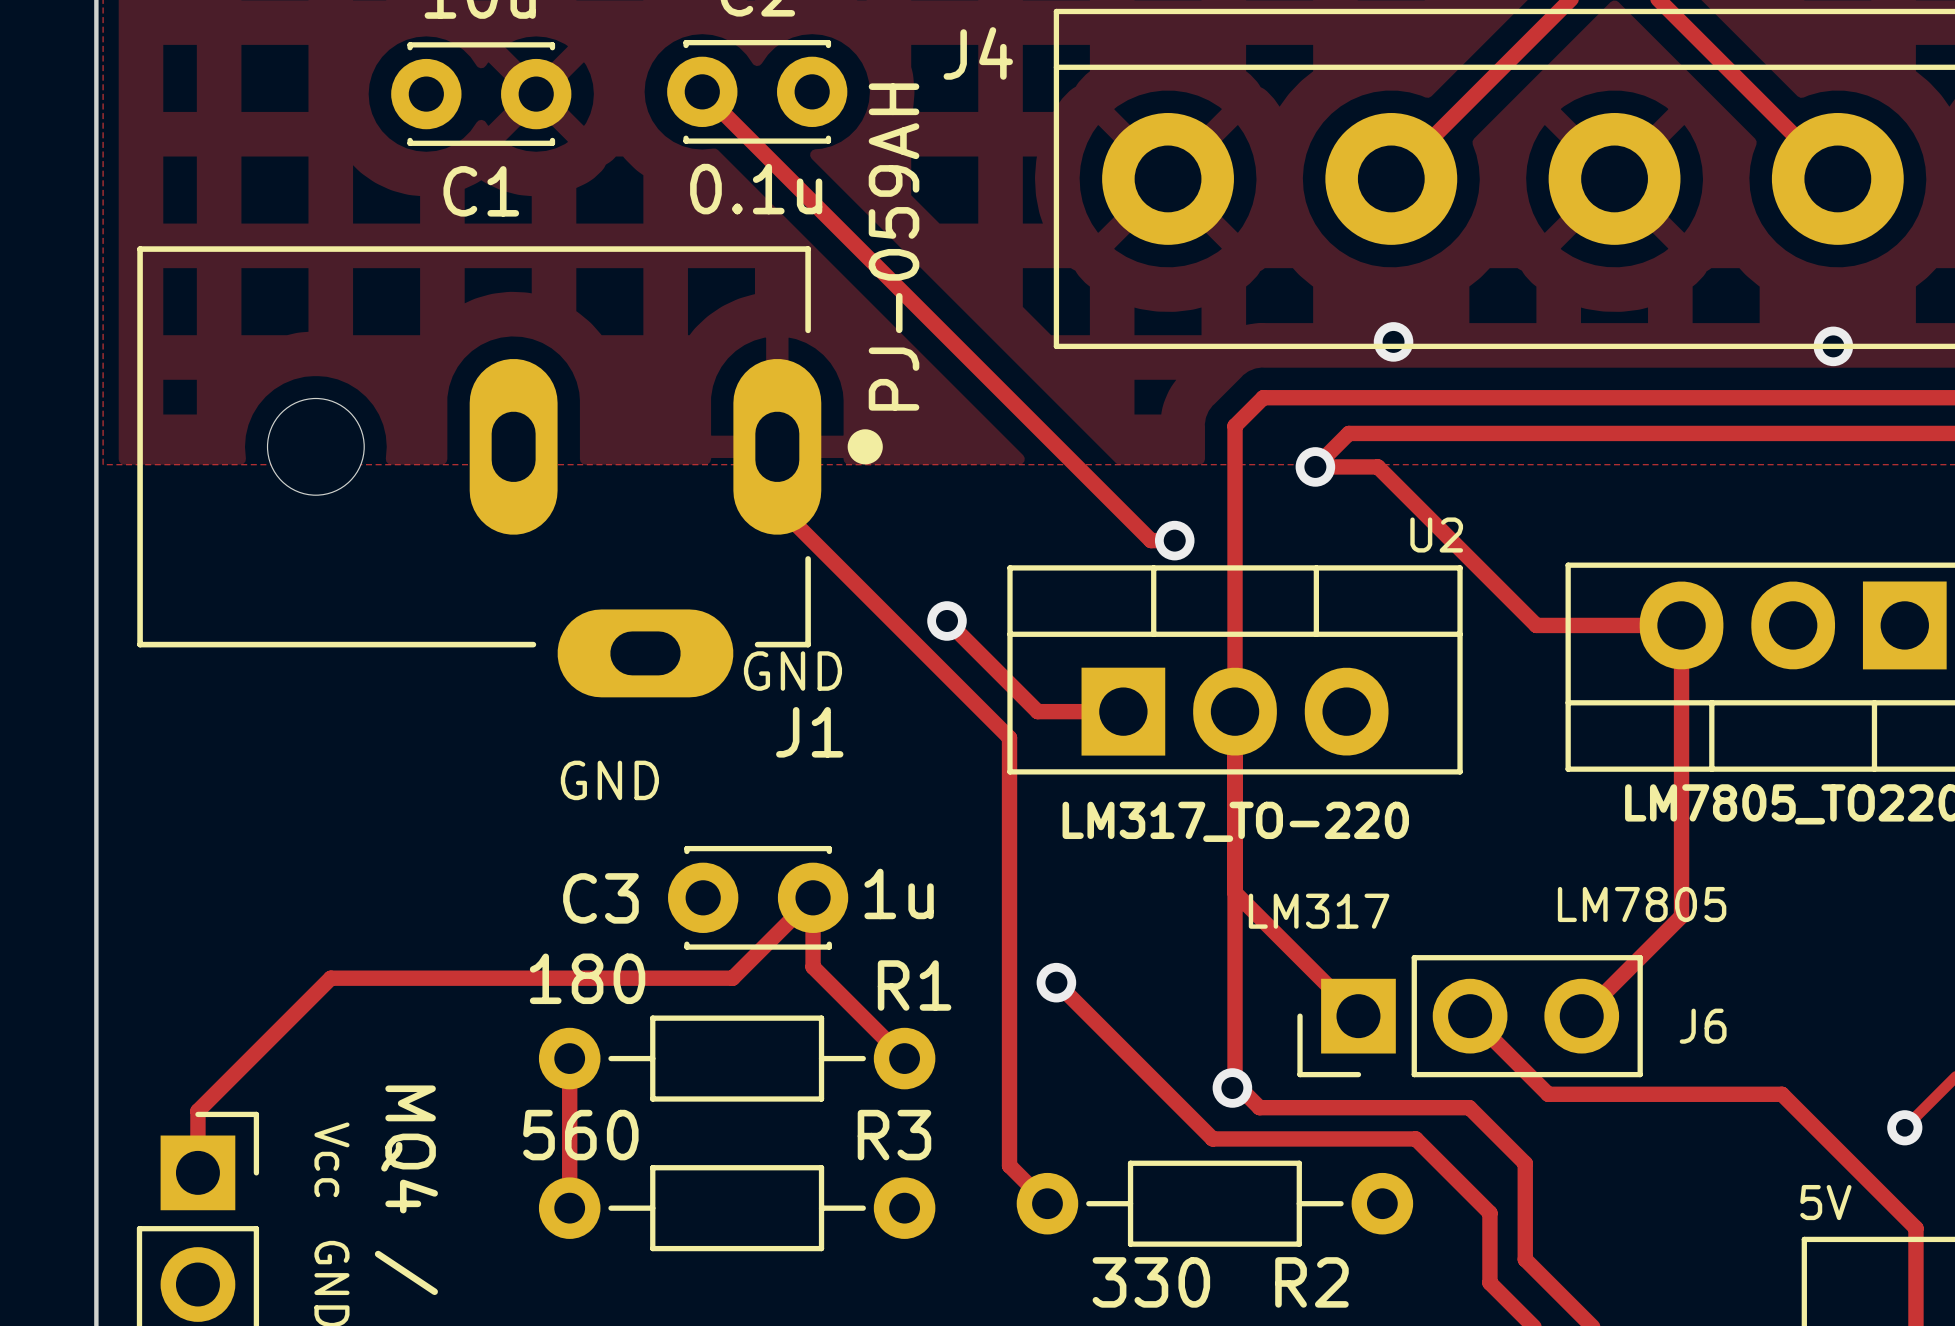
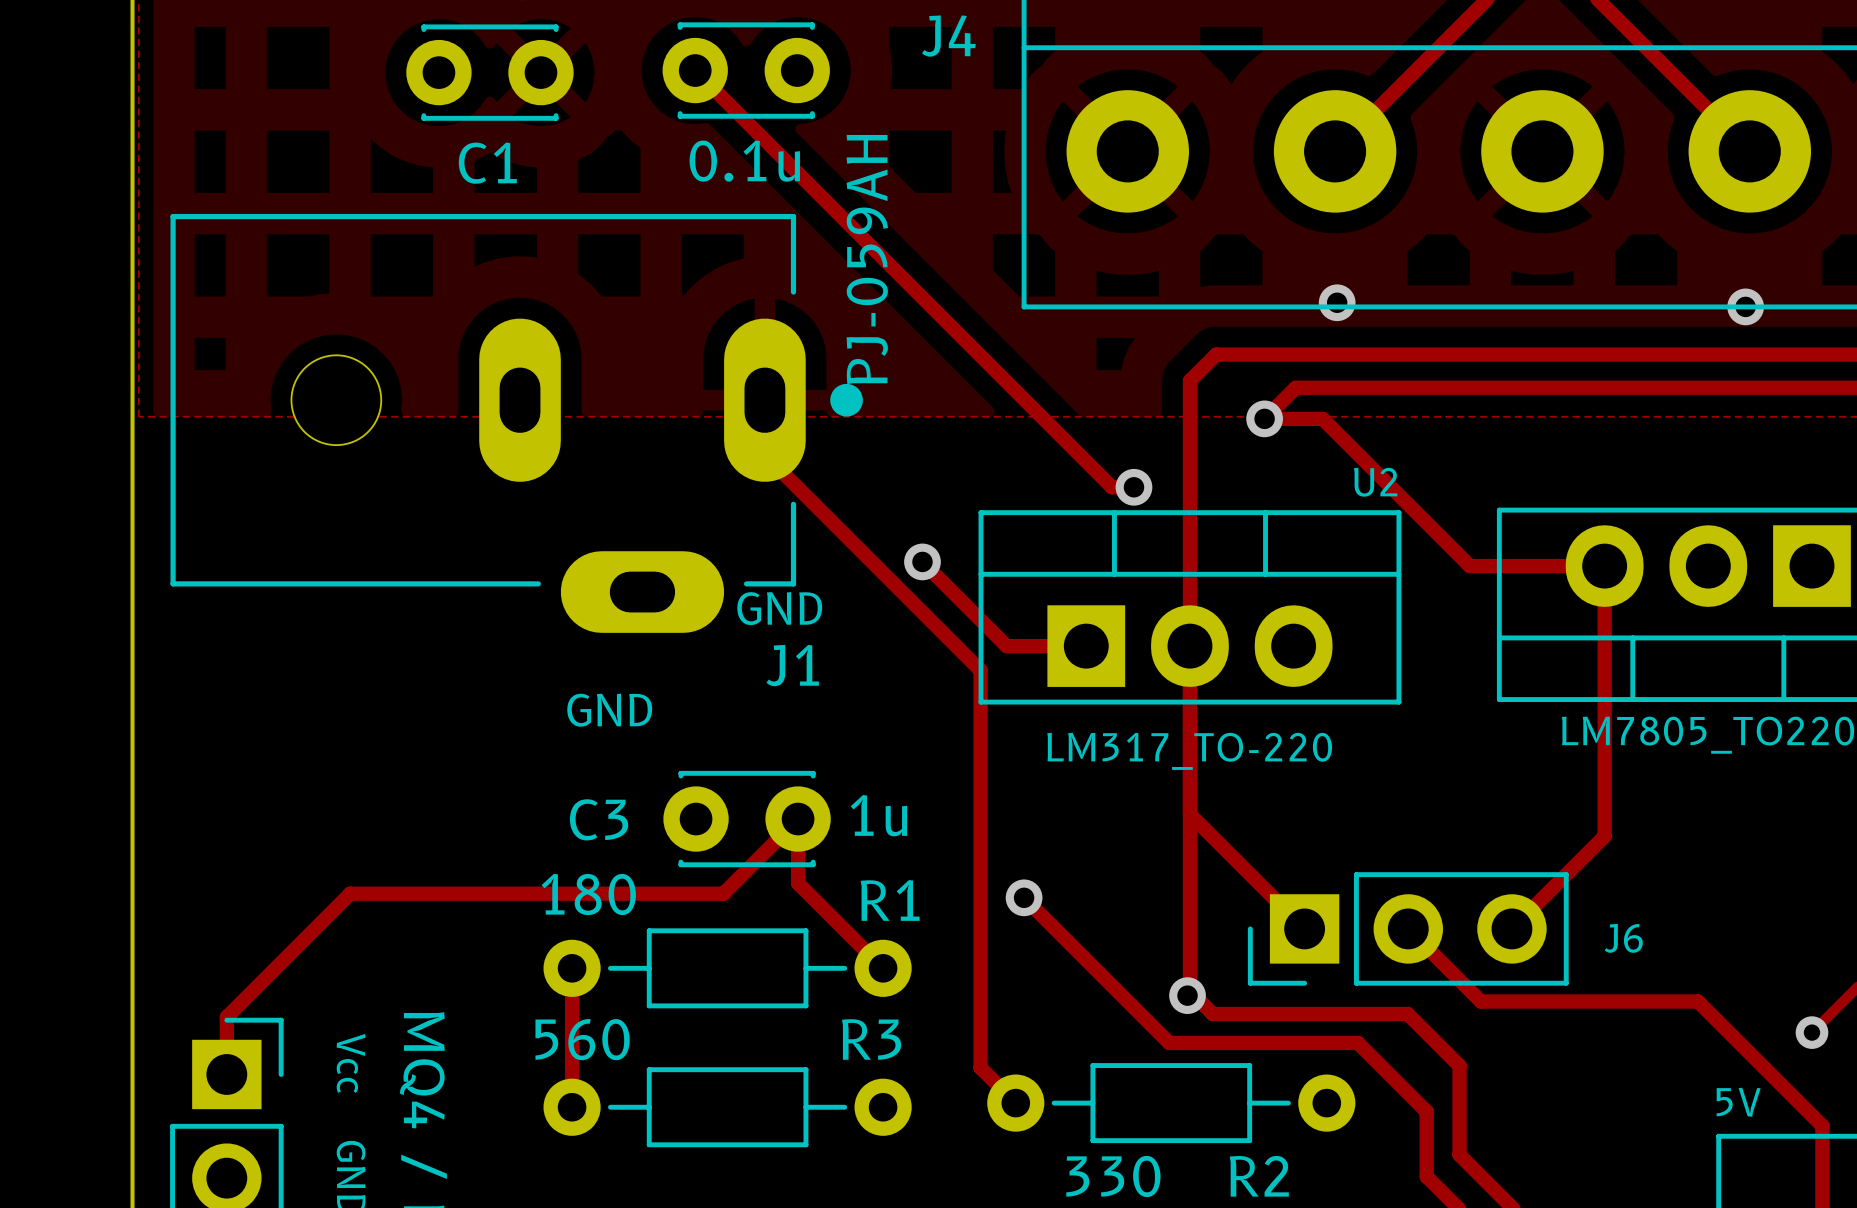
J1 value position: PJ-059AH (894, 247) -> PJ-059AH (867, 259)
text: LM7805 (1642, 904) -> none
text: LM317 (1319, 911) -> none

